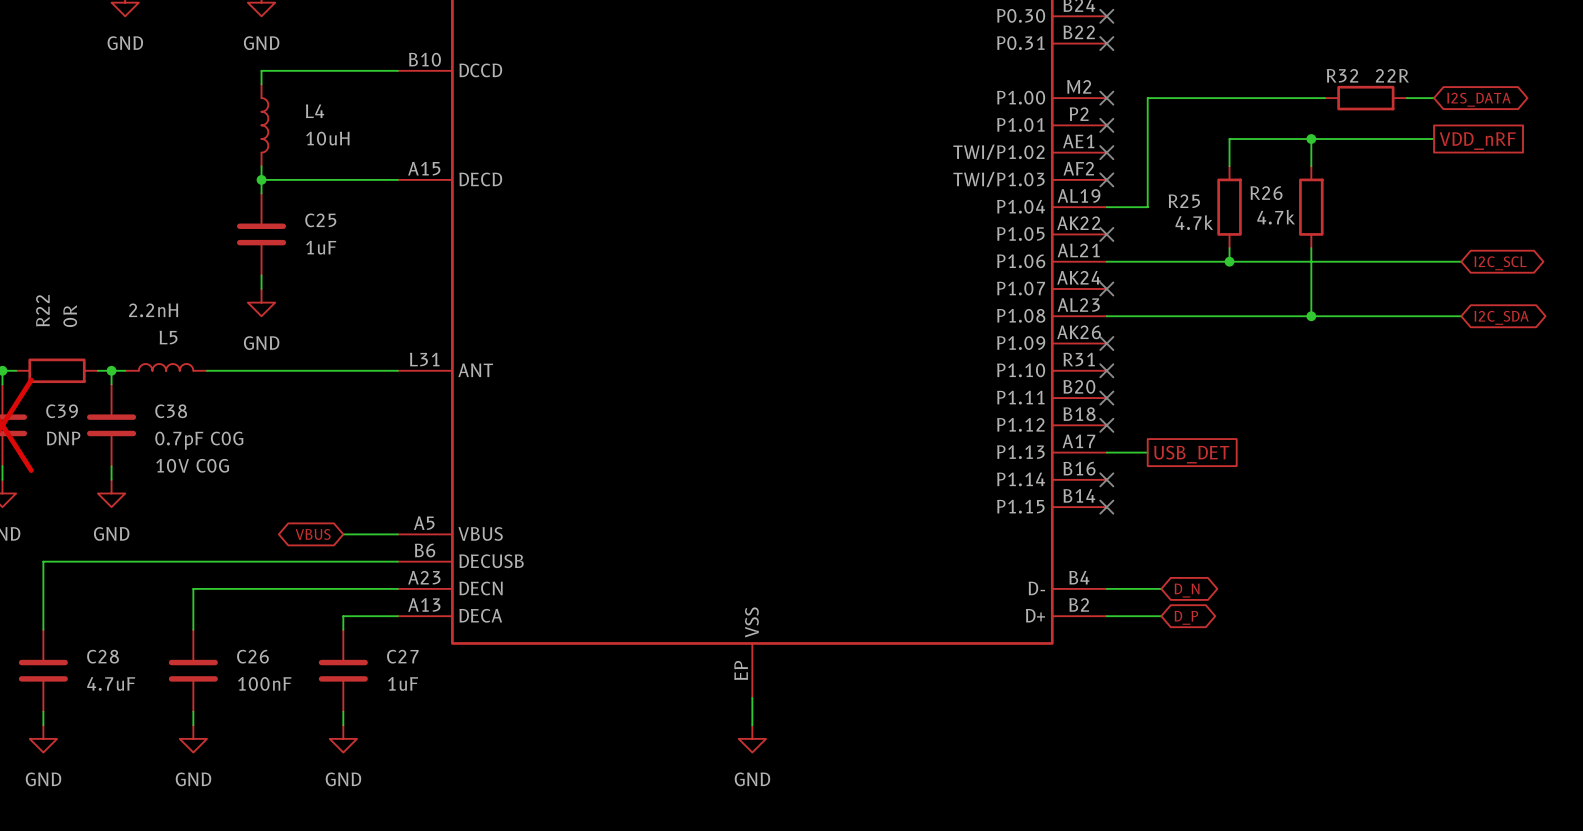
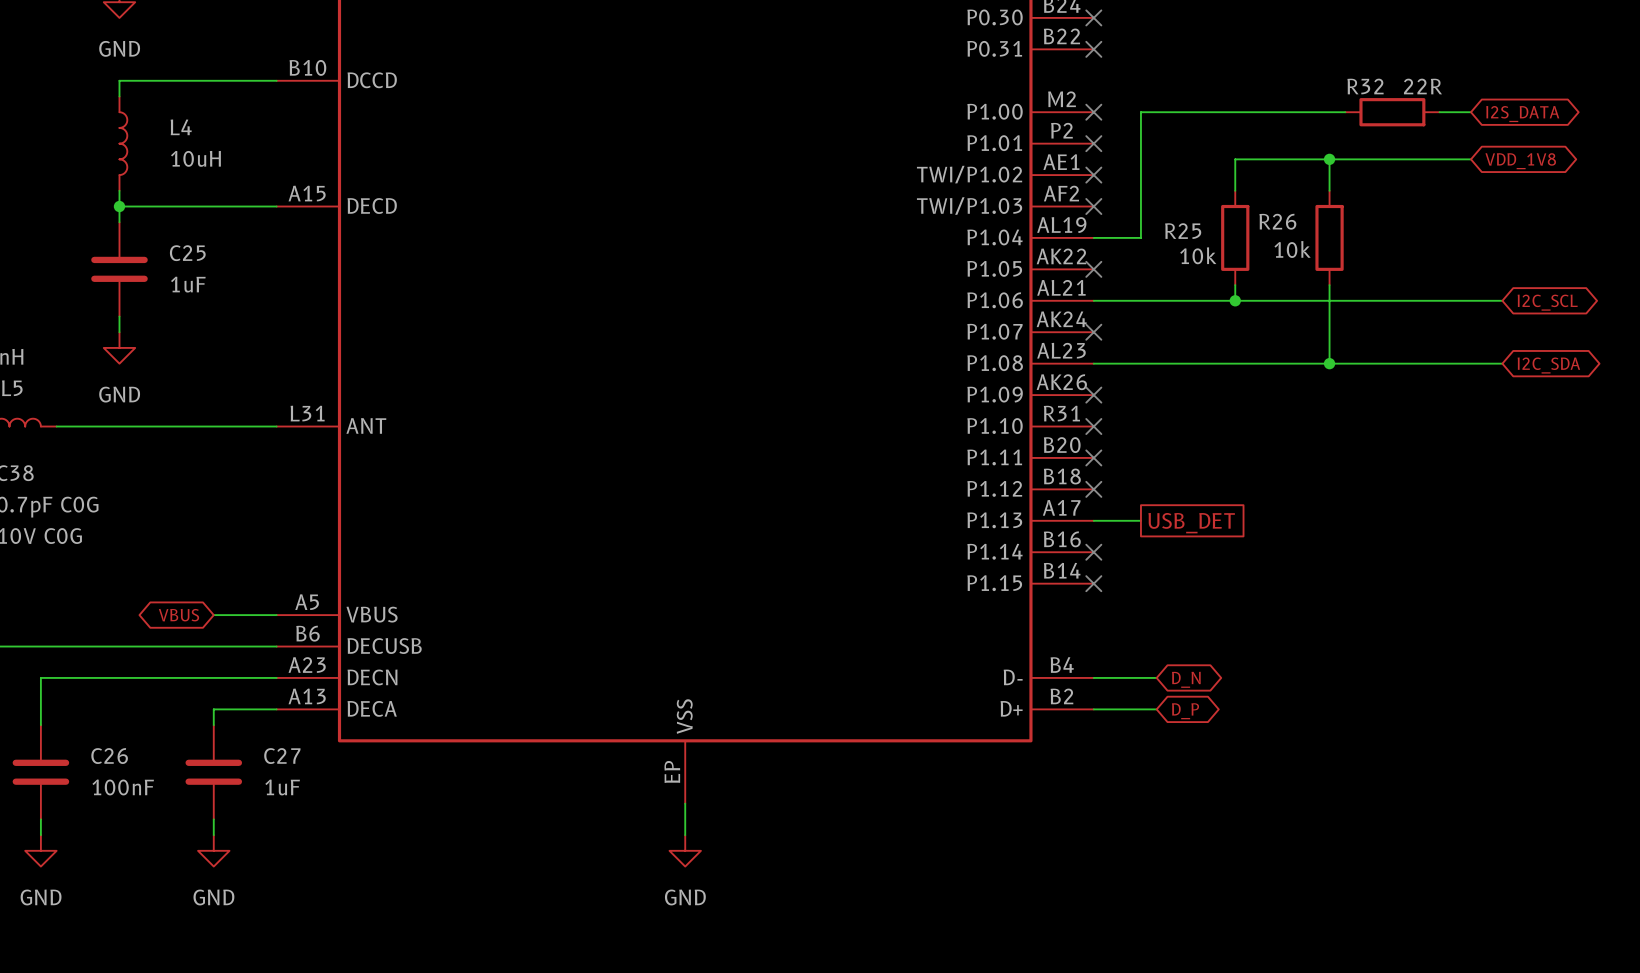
global label shape: passive (1477, 141) -> bidirectional (1520, 161)
global label: VDD_nRF (1477, 141) -> VDD_1V8 (1520, 161)
R26 value: 4.7k (1276, 217) -> 10k (1292, 249)
R25 value: 4.7k (1194, 222) -> 10k (1198, 255)

